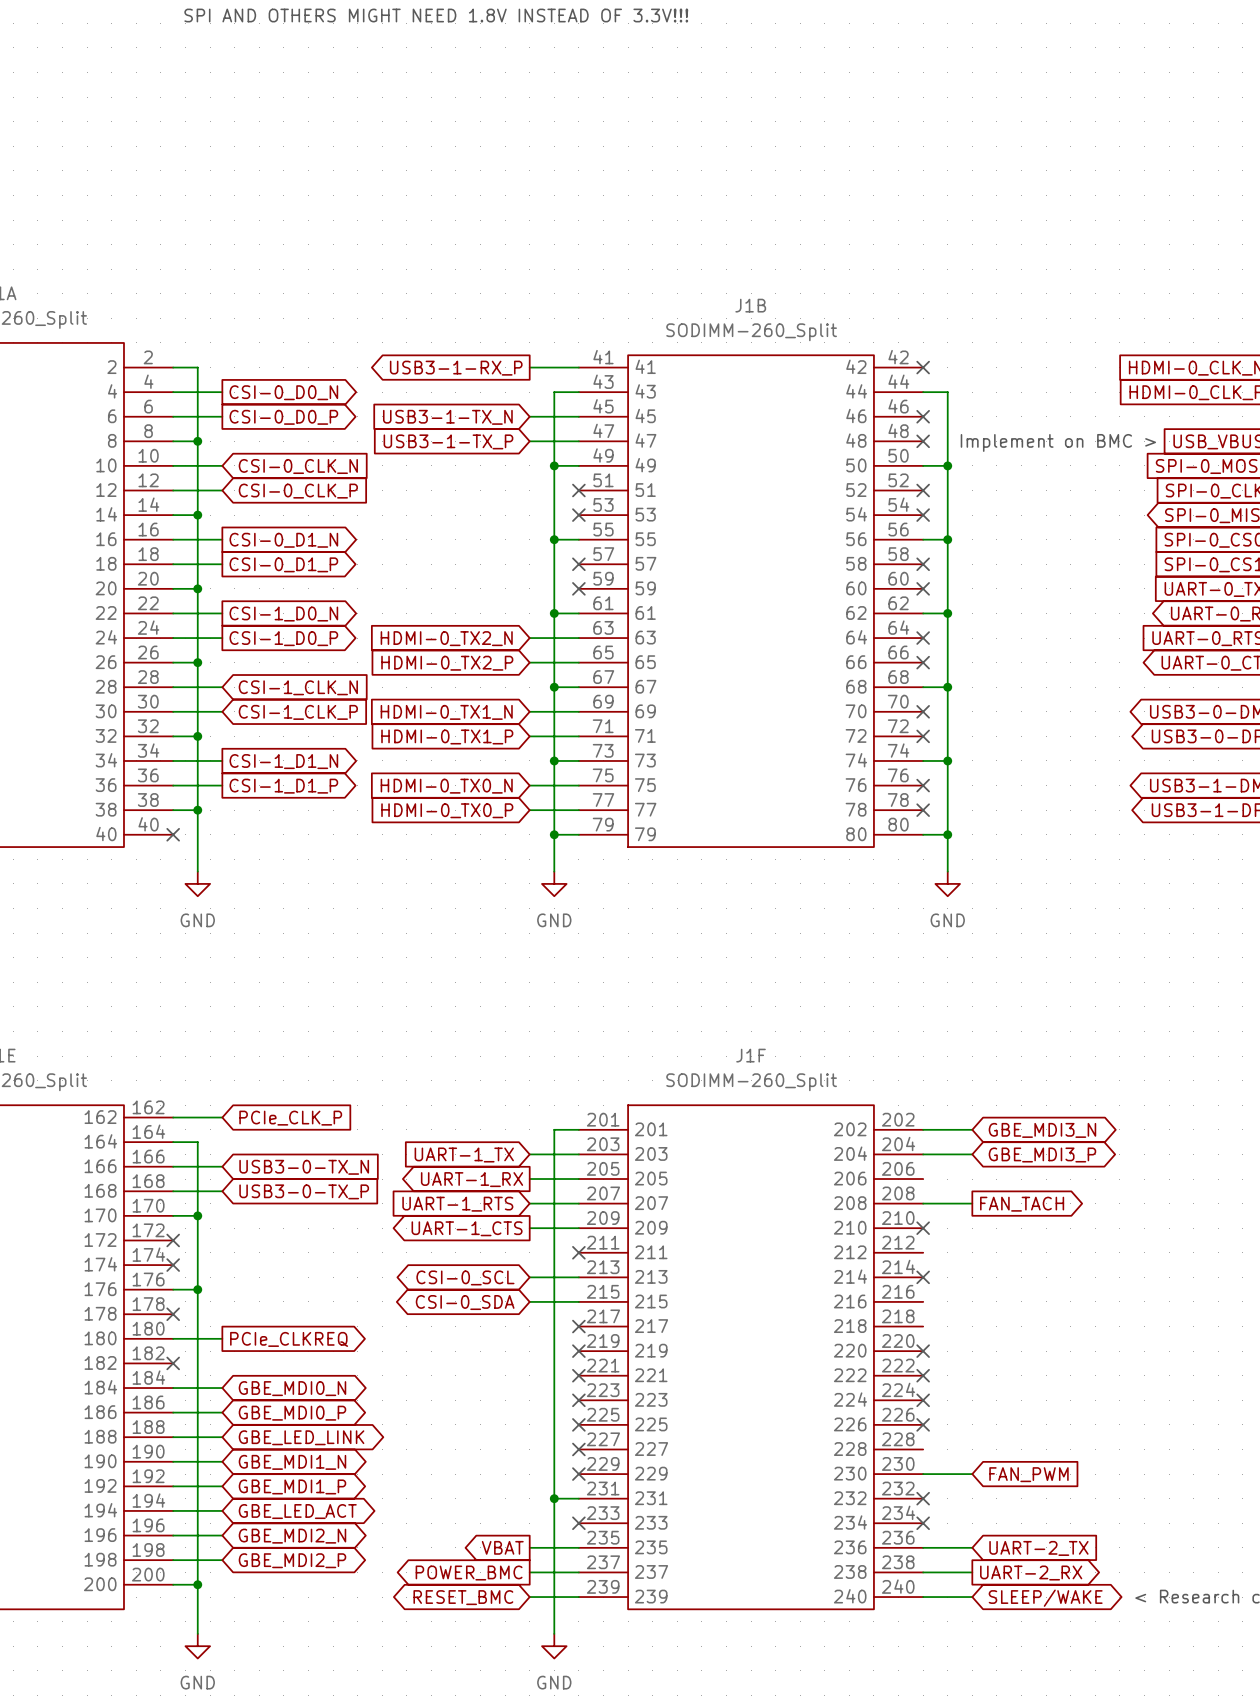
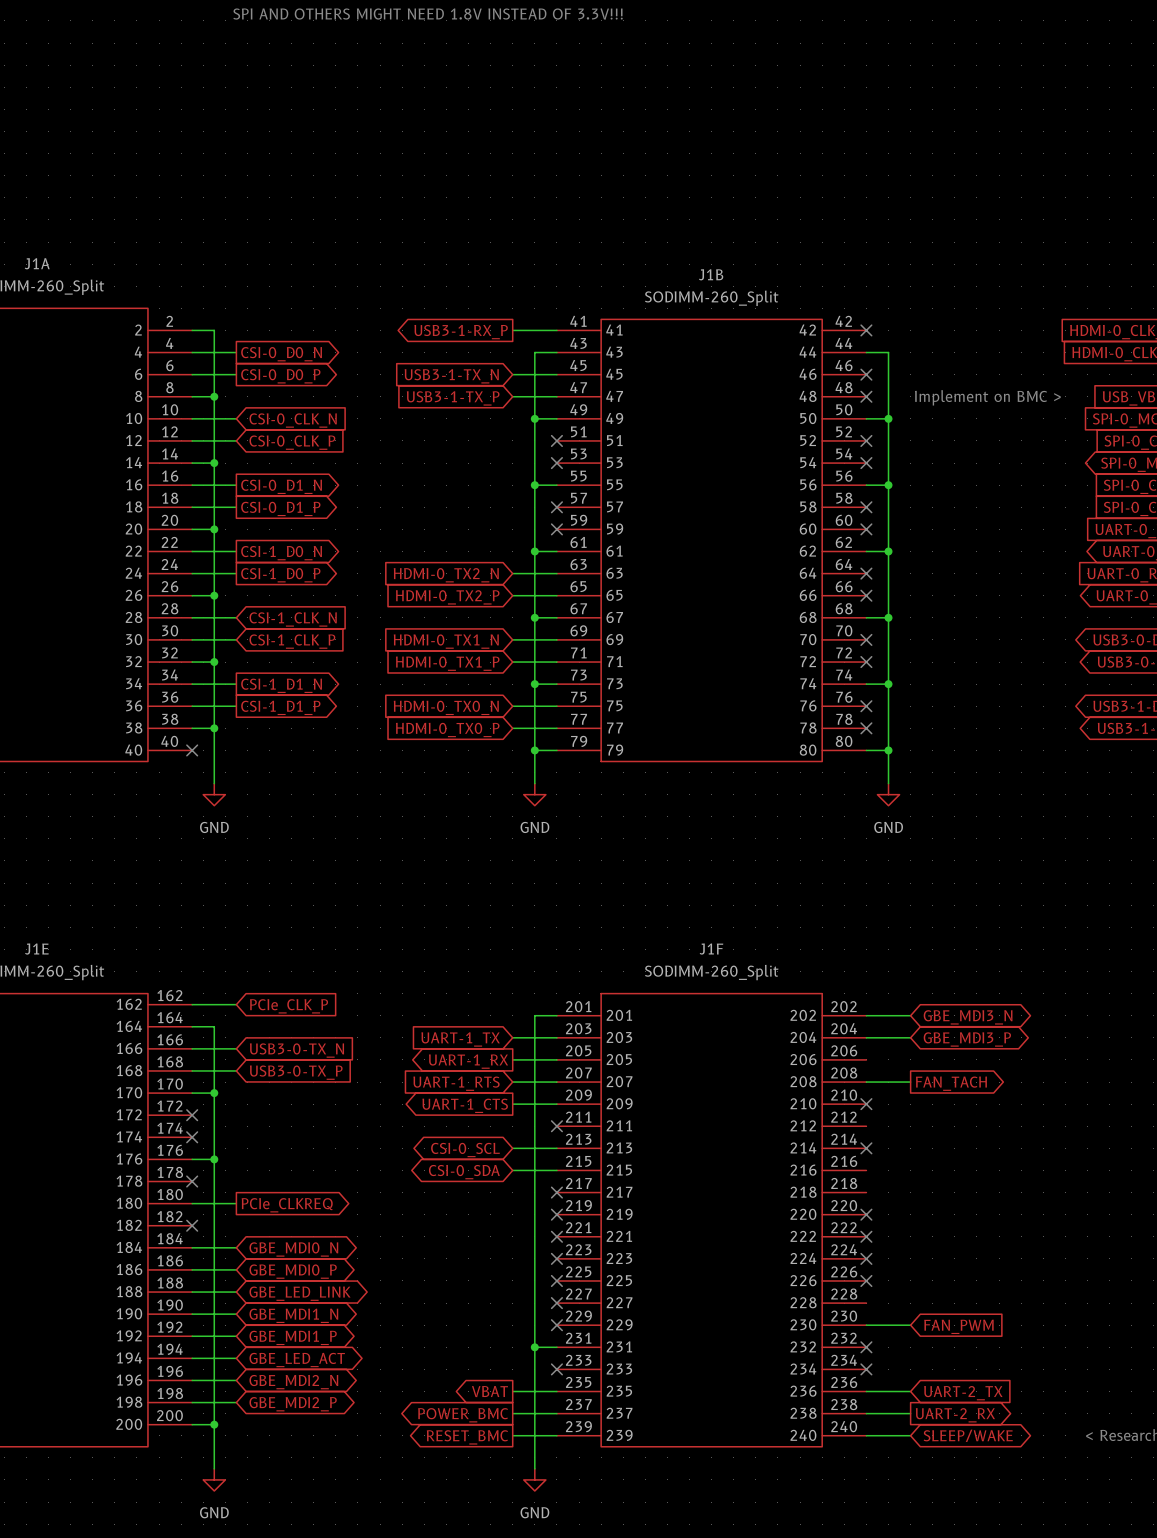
global label shape: bidirectional (463, 1597) -> output (467, 1437)

